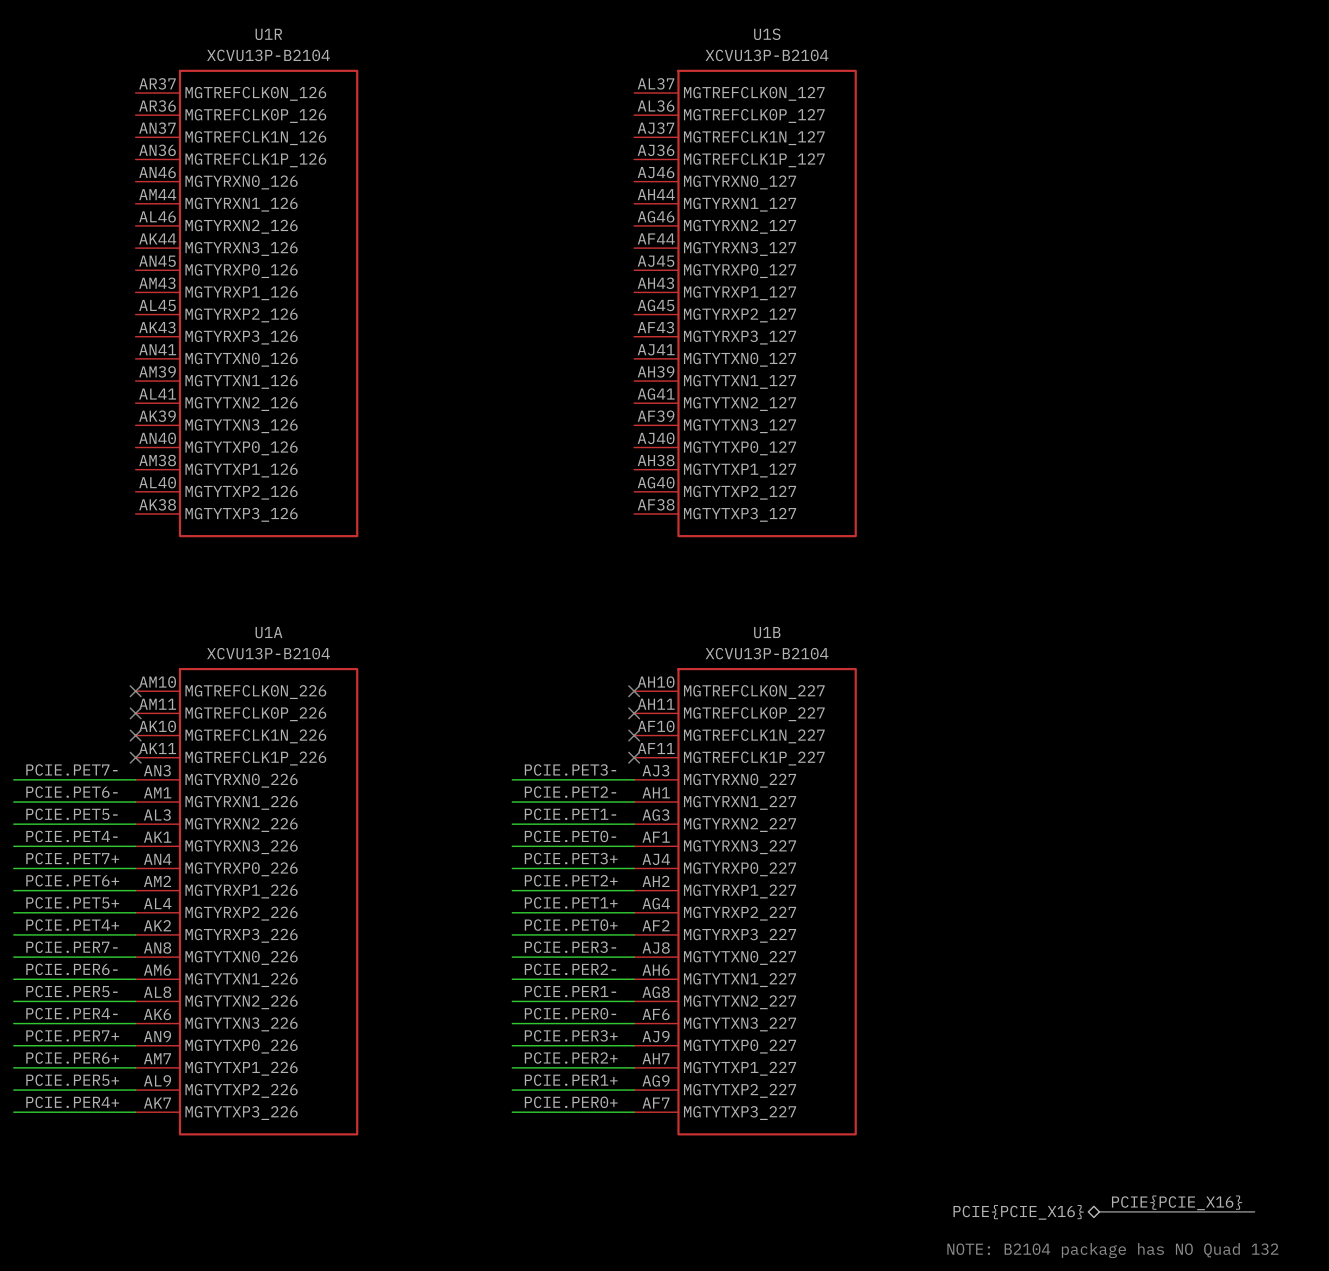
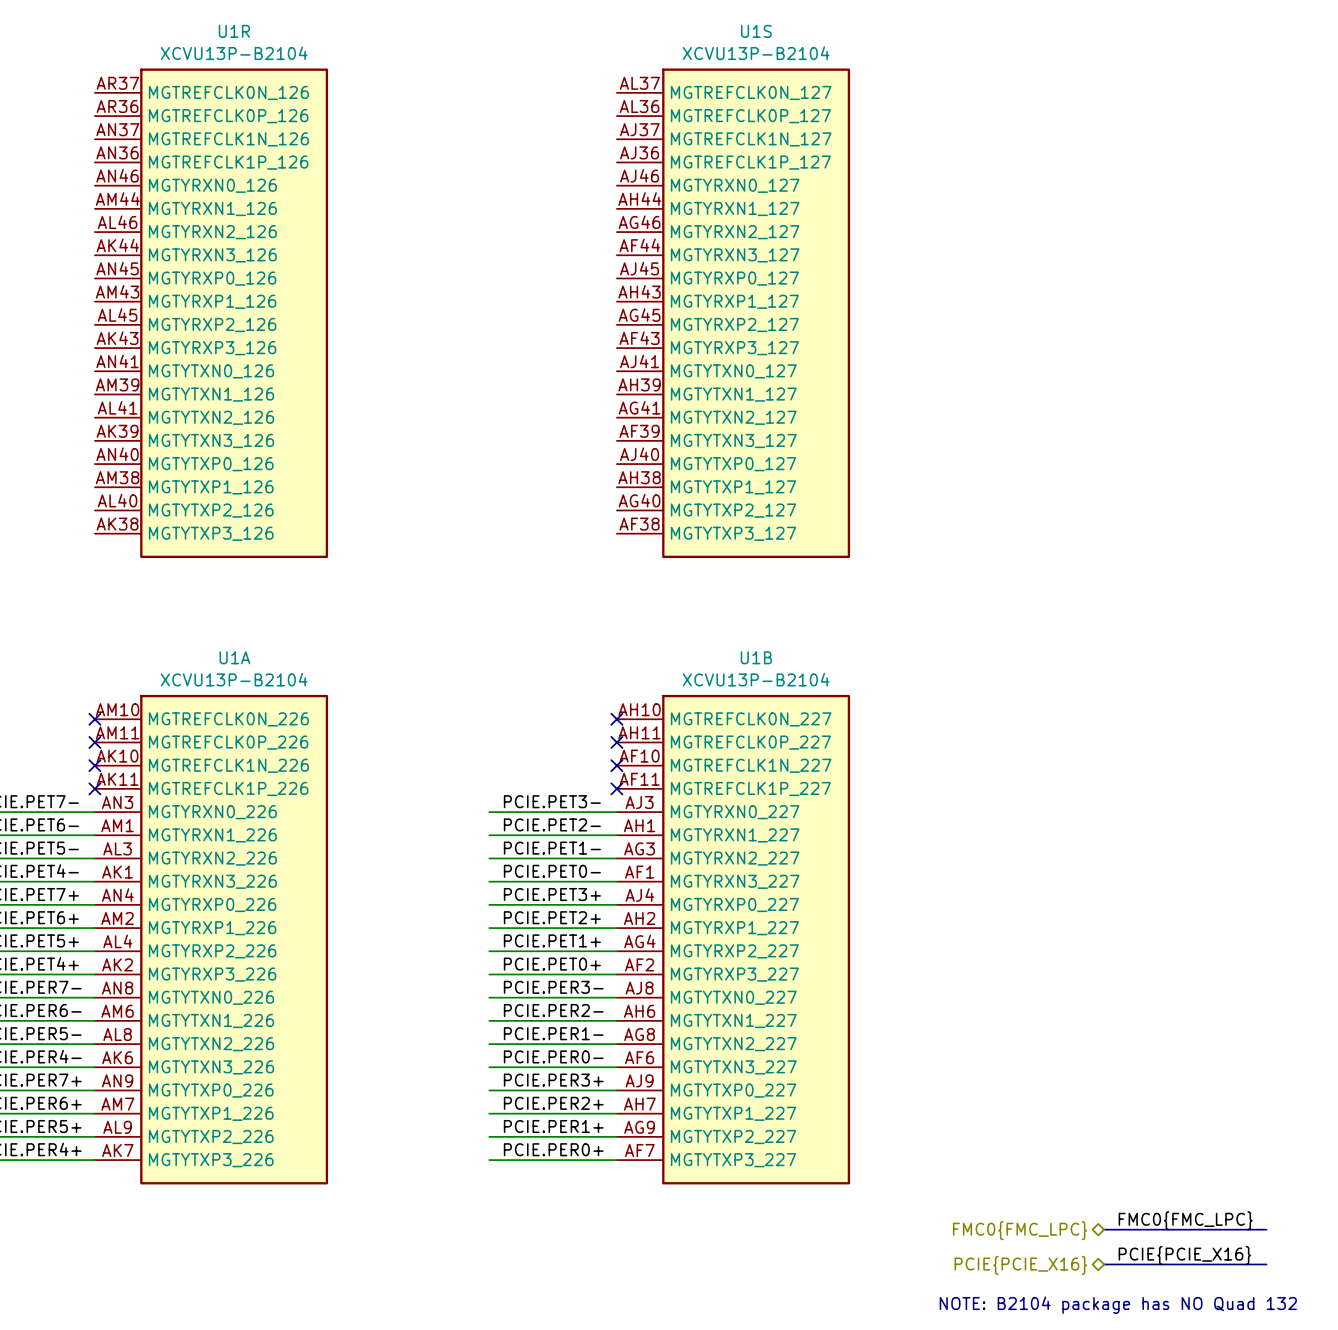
label: none -> FMC0{FMC_LPC} (1185, 1220)
bus: none -> (1104, 1229) (1266, 1229)
hierarchical label: none -> FMC0{FMC_LPC} (1019, 1230)

